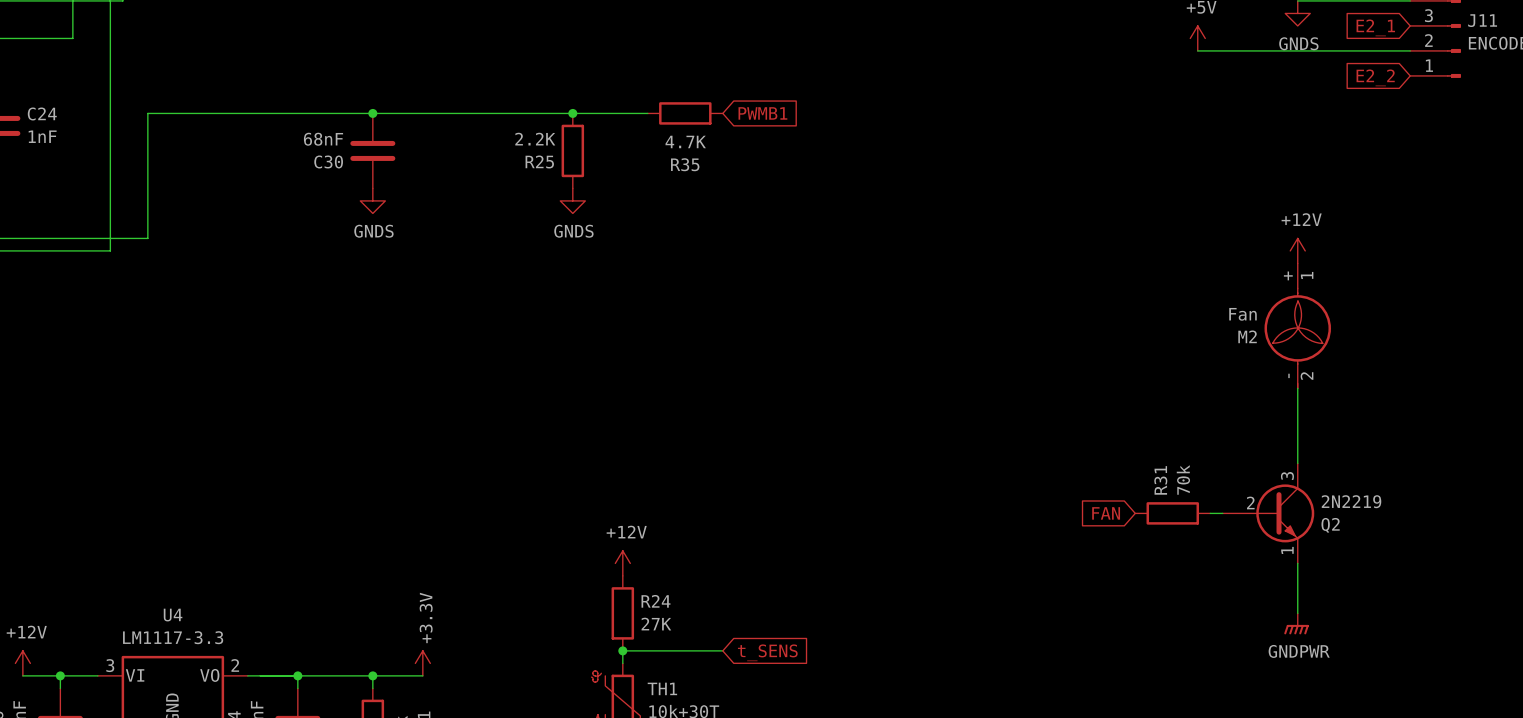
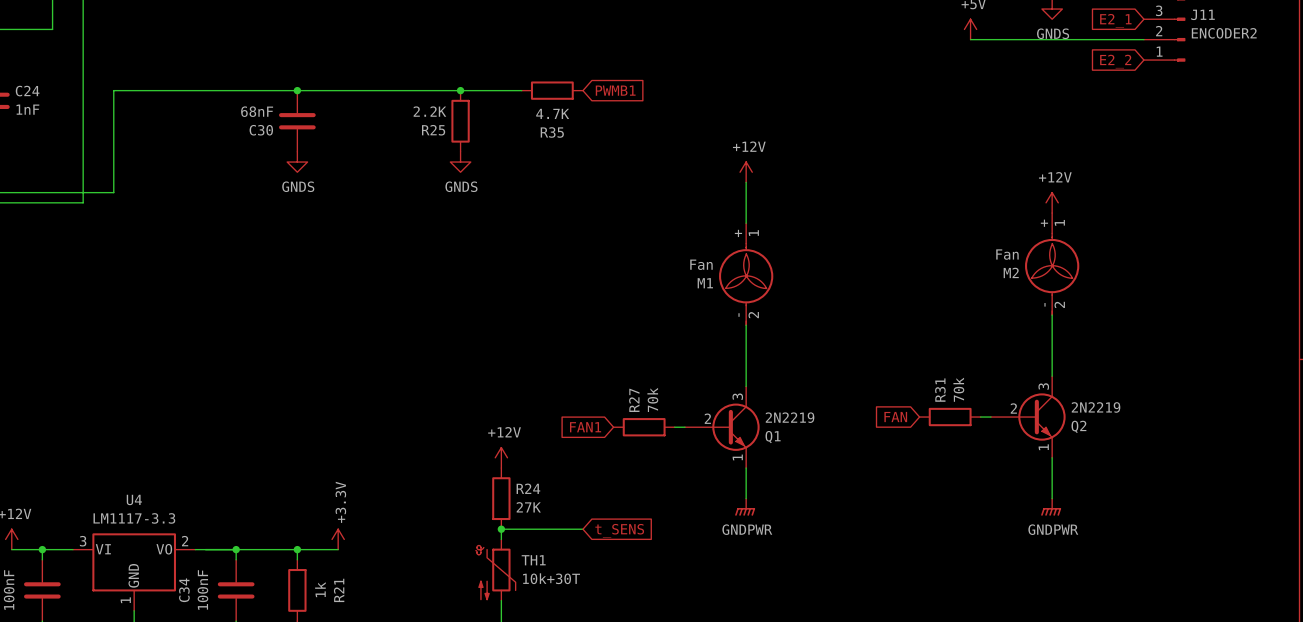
power symbol: none -> +12V (746, 172)
wire: none -> (746, 182) (746, 223)
M1: none -> Fan (746, 274)
wire: none -> (746, 325) (746, 386)
global label: none -> FAN1 (585, 427)
R27: none -> 70k (644, 427)
wire: none -> (674, 427) (684, 427)
Q1: none -> 2N2219 (722, 427)
wire: none -> (746, 468) (746, 498)
power symbol: none -> GNDPWR (745, 507)

